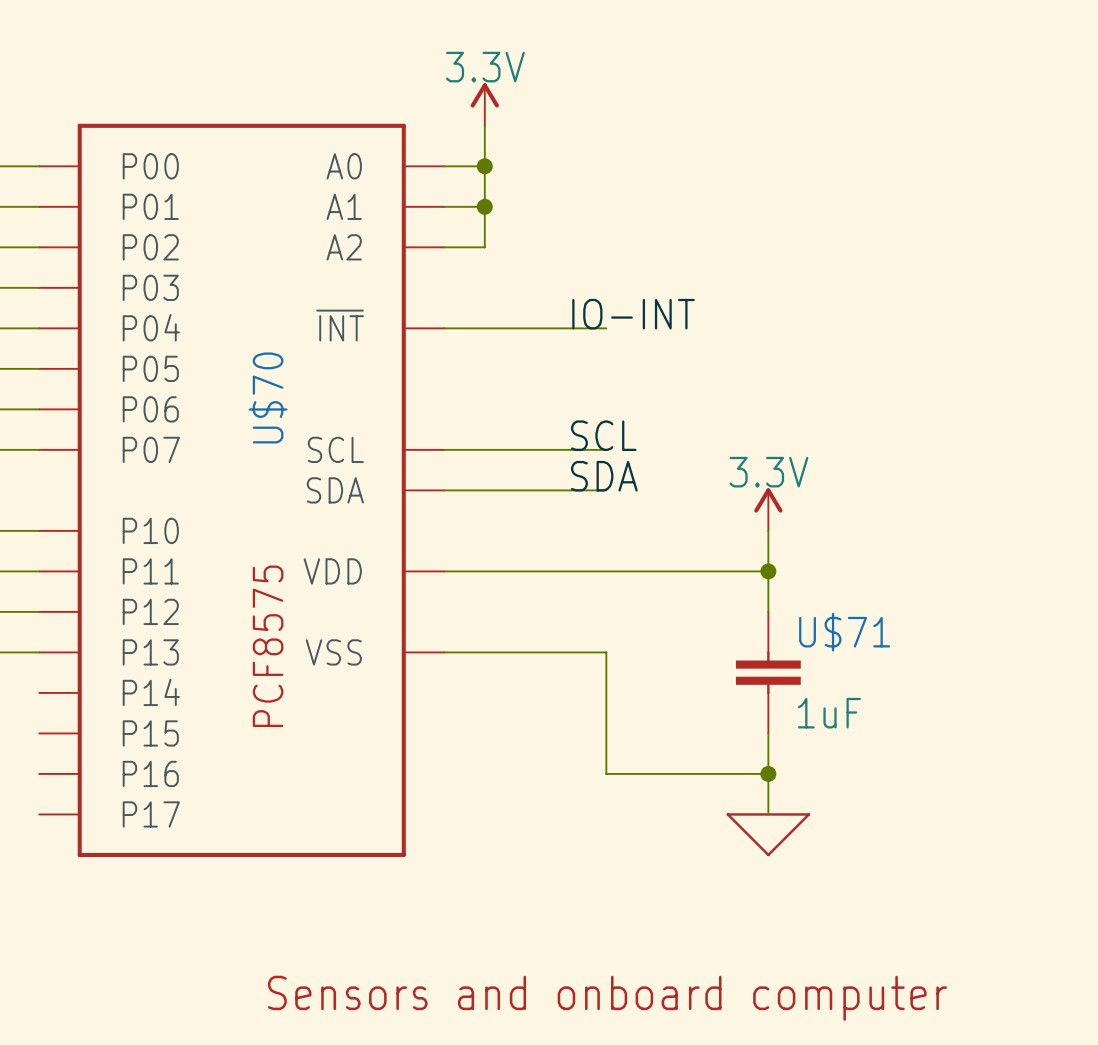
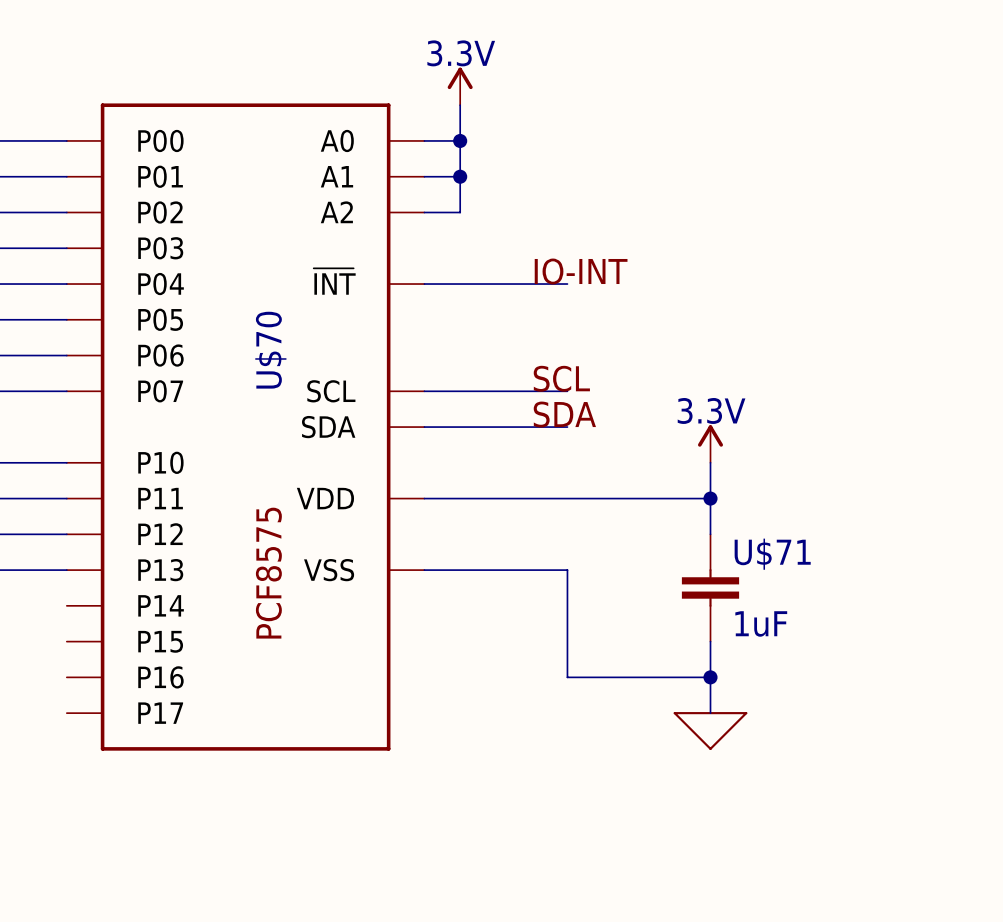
text: Sensors and onboard computer (607, 998) -> none

